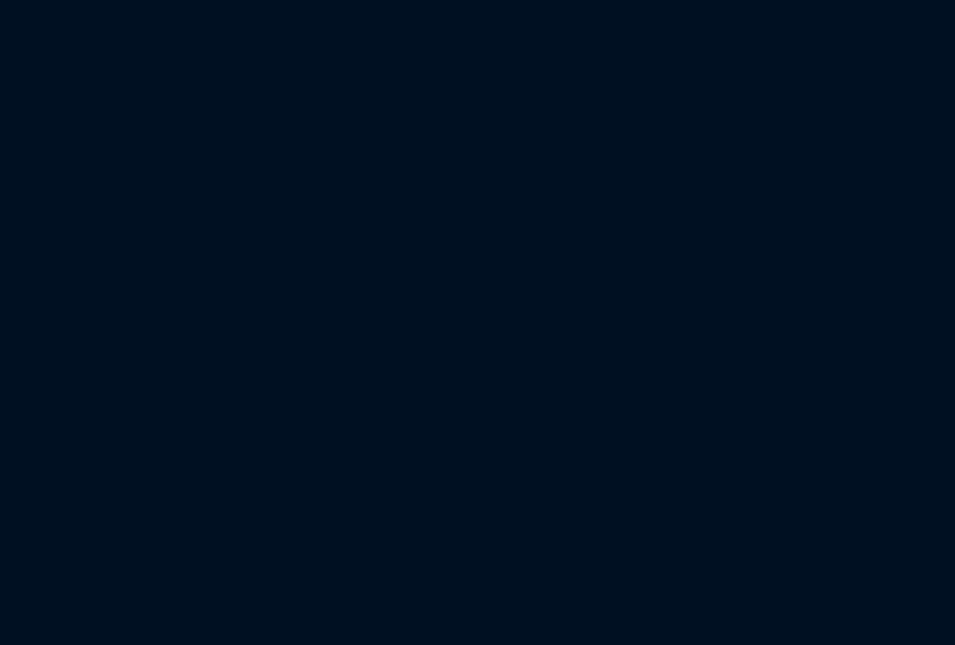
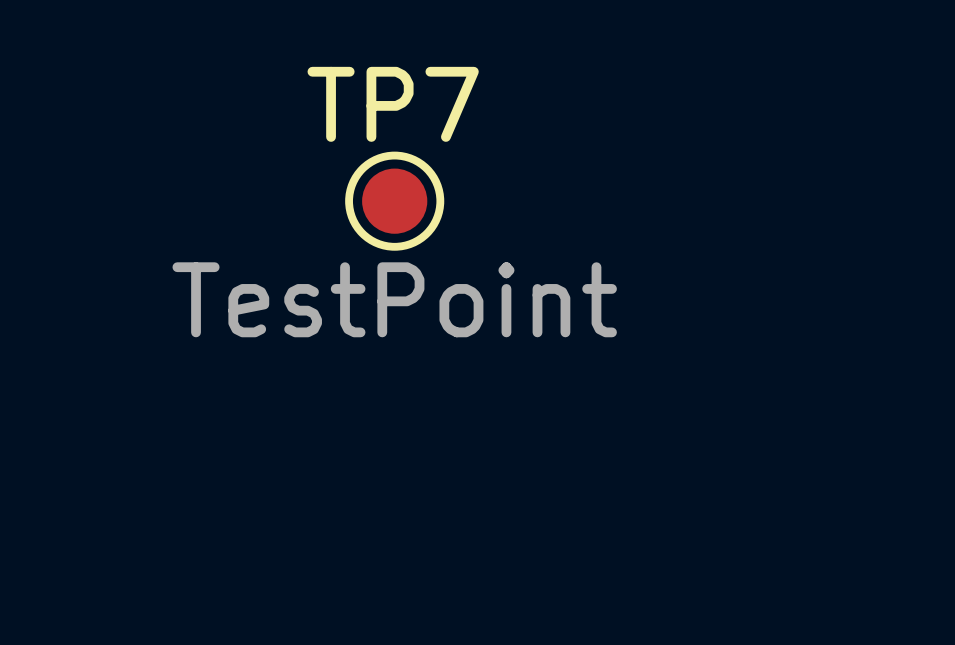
TP7: none -> TestPoint (394, 201)

